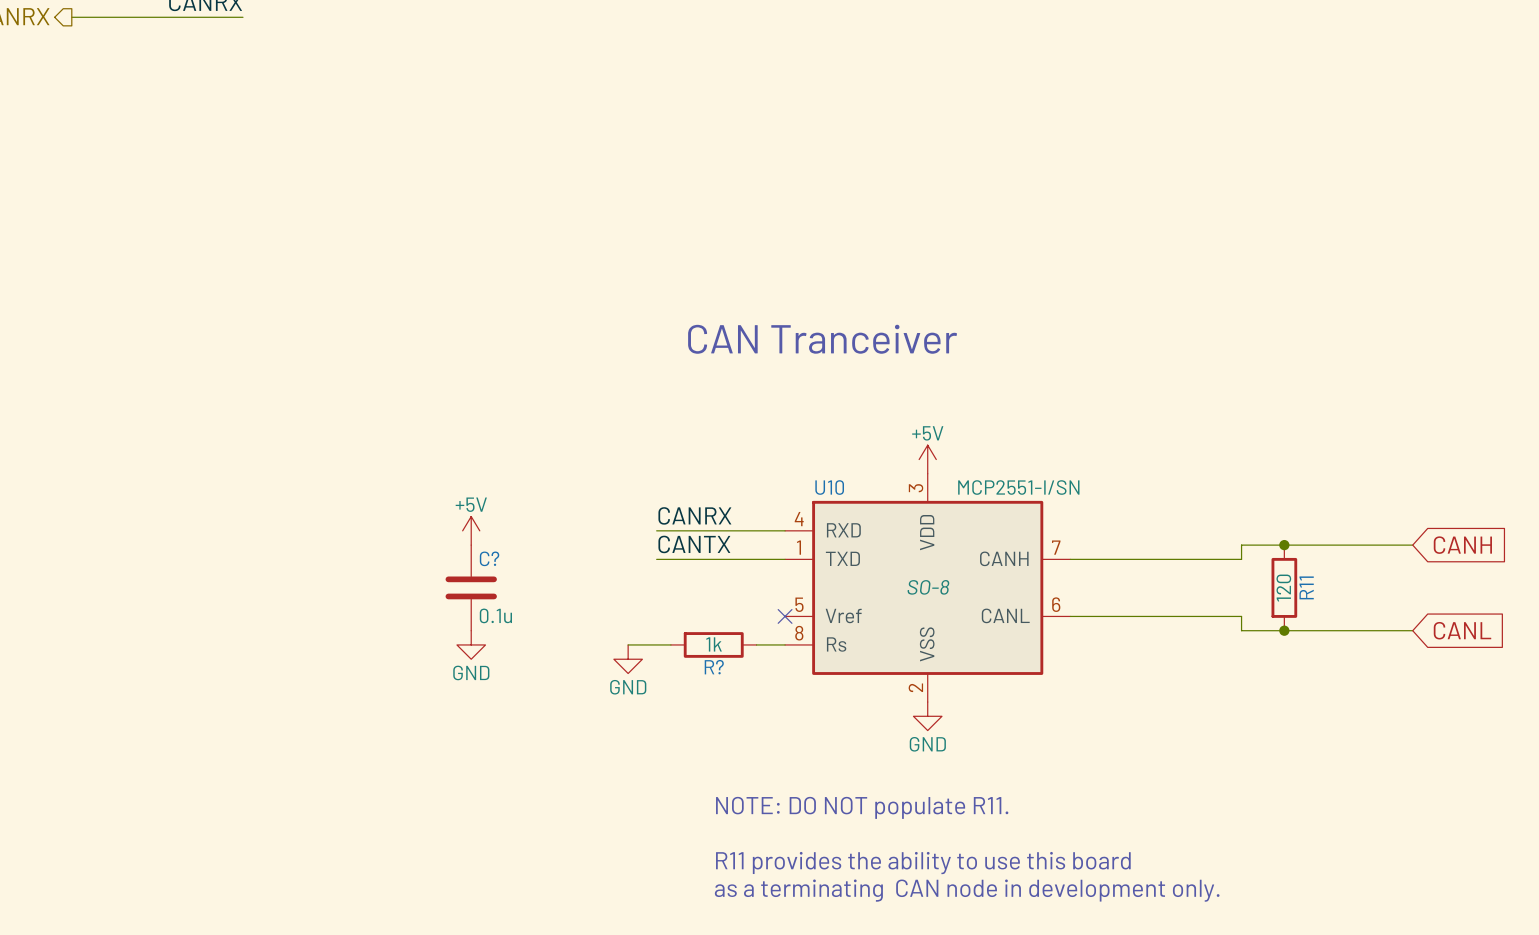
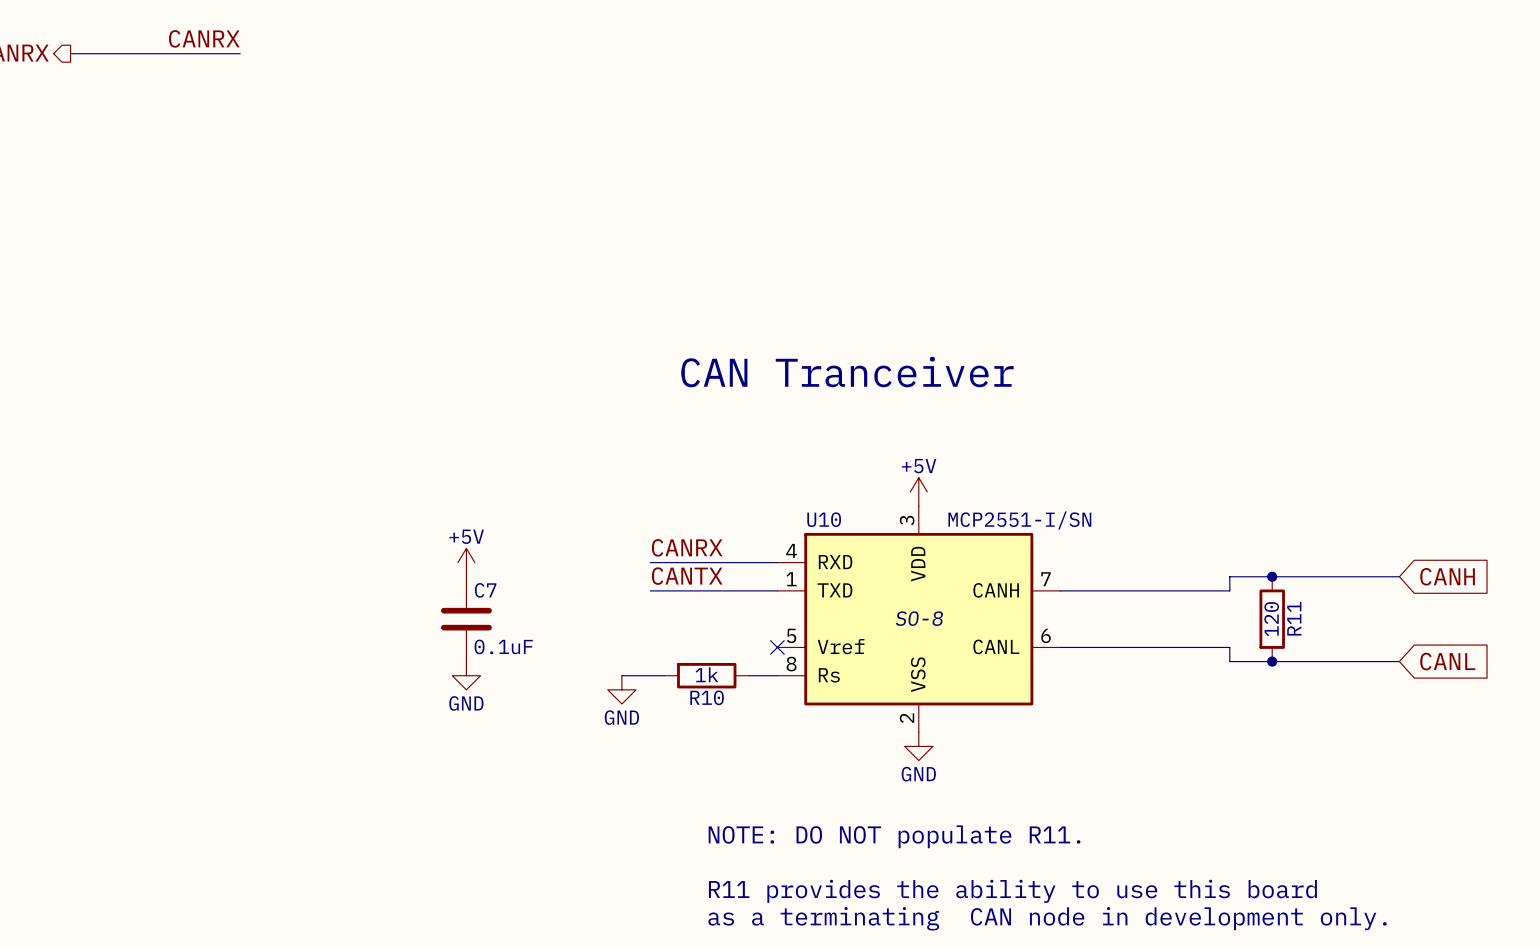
C? name: C? (489, 558) -> C7 (485, 590)
C? value: 0.1u (495, 615) -> 0.1uF (503, 646)
R? name: R? (714, 667) -> R10 (707, 697)

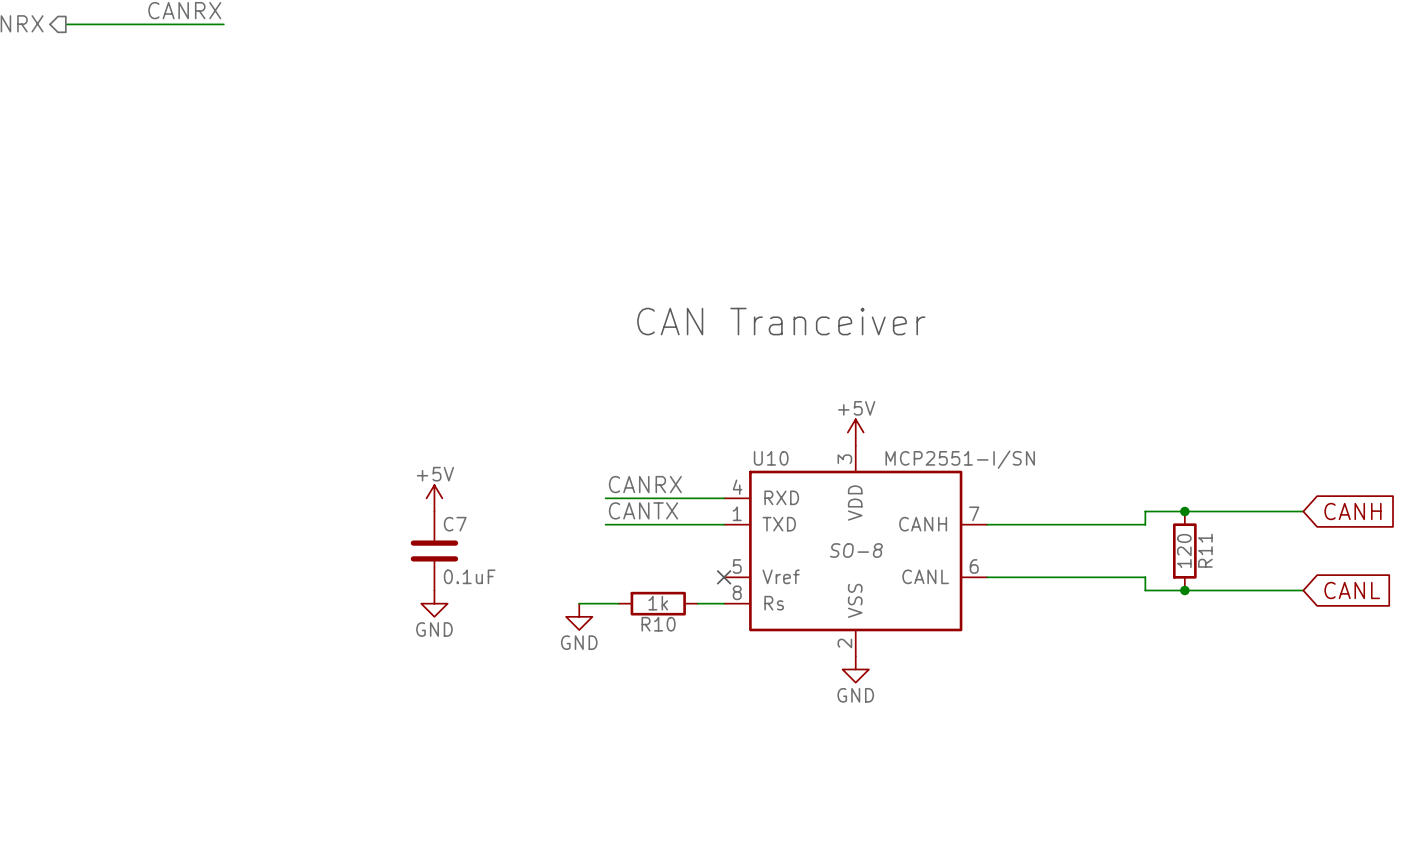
text: NOTE: DO NOT populate R11. (894, 836) -> none
text: R11 provides the ability to use this board (1012, 891) -> none
text: as a terminating CAN node in development only. (1047, 918) -> none

